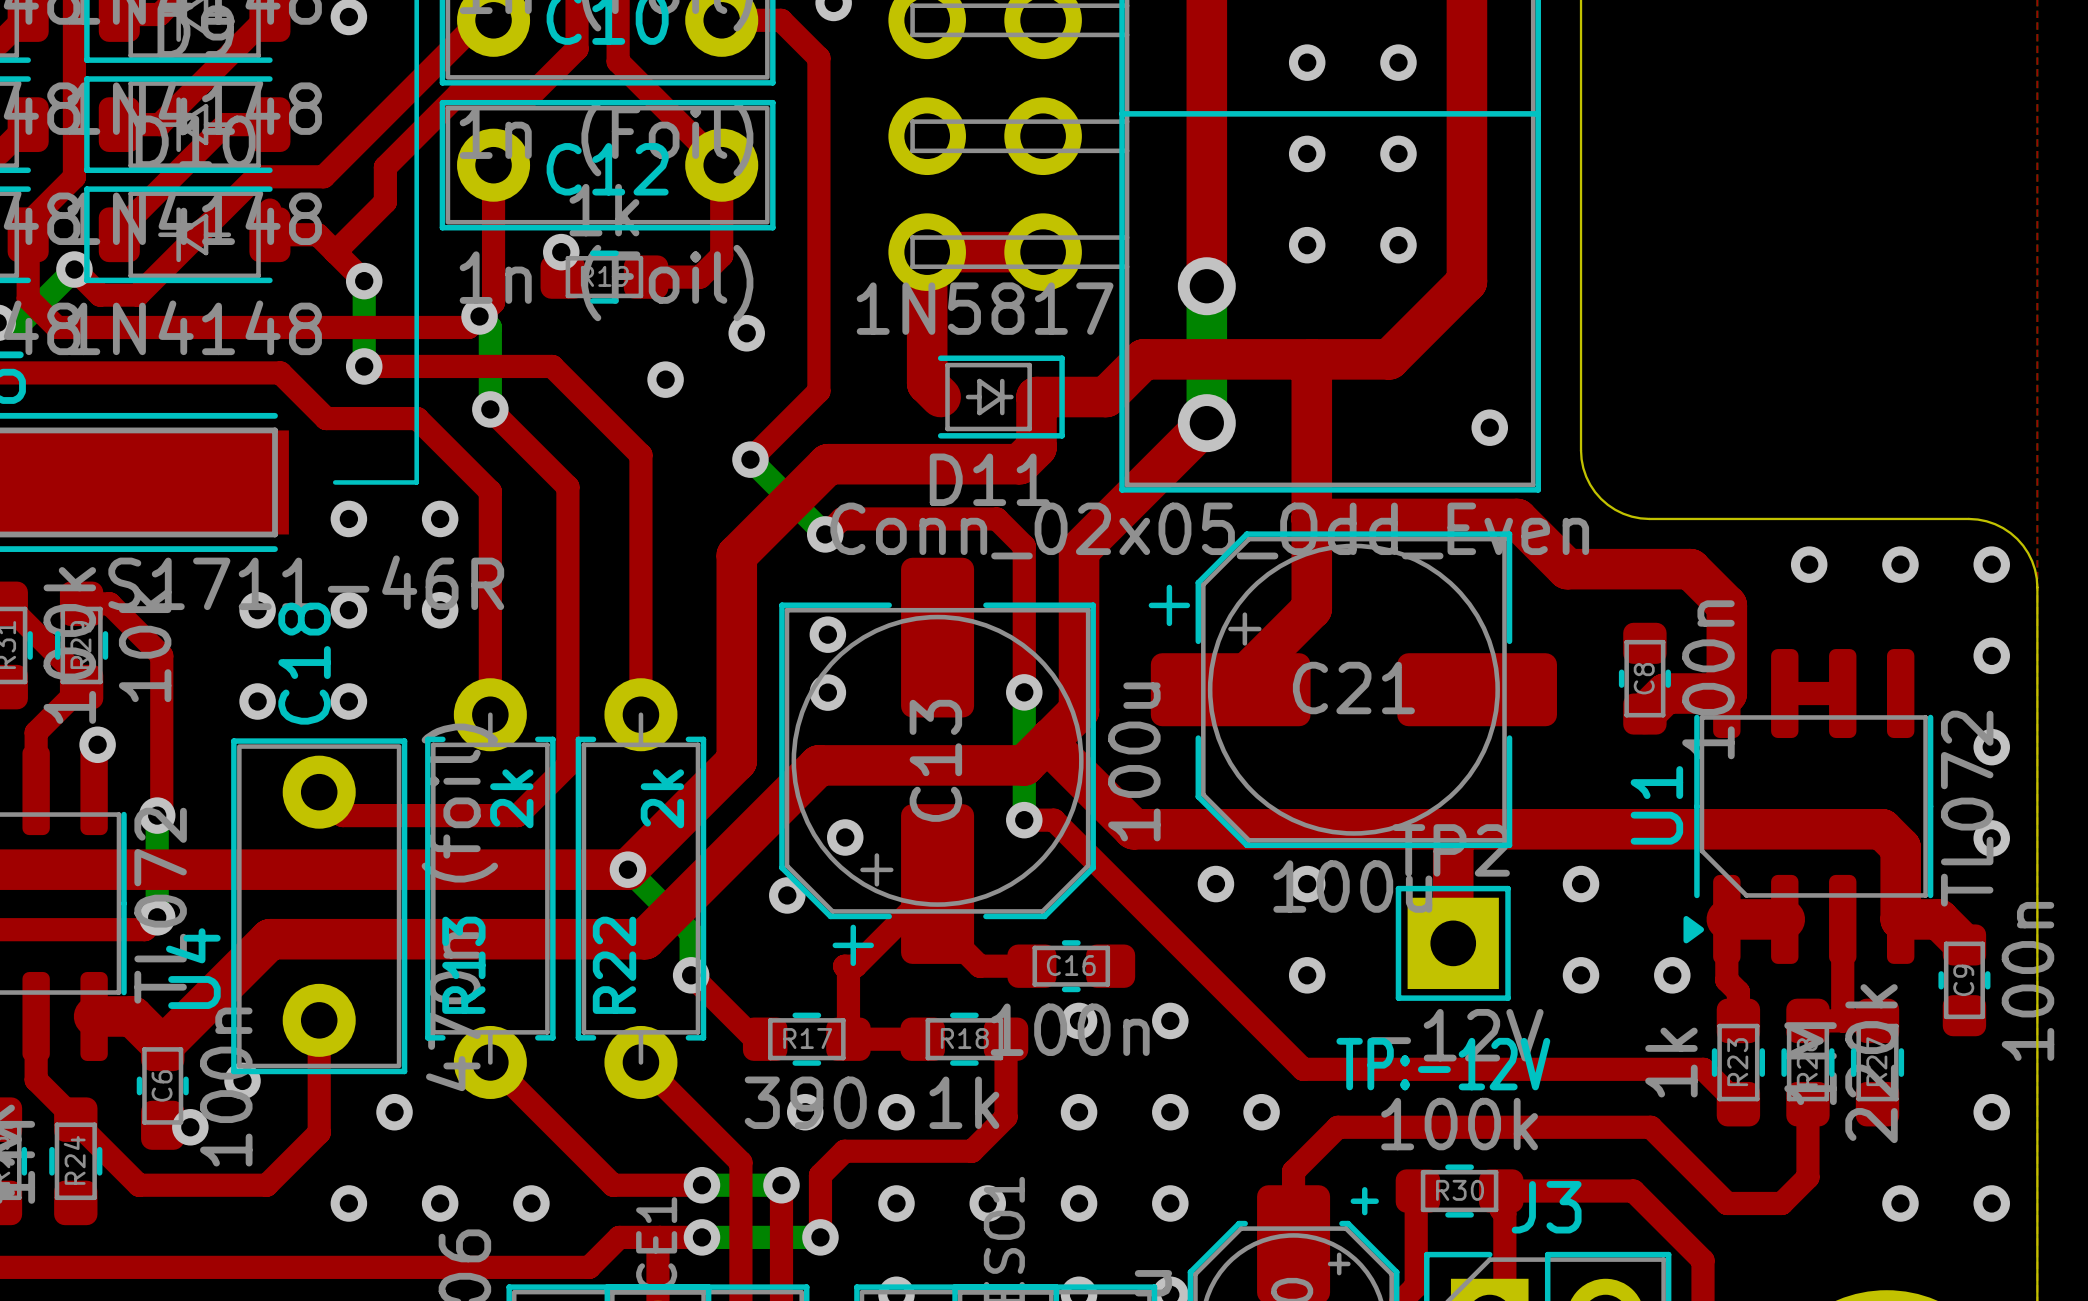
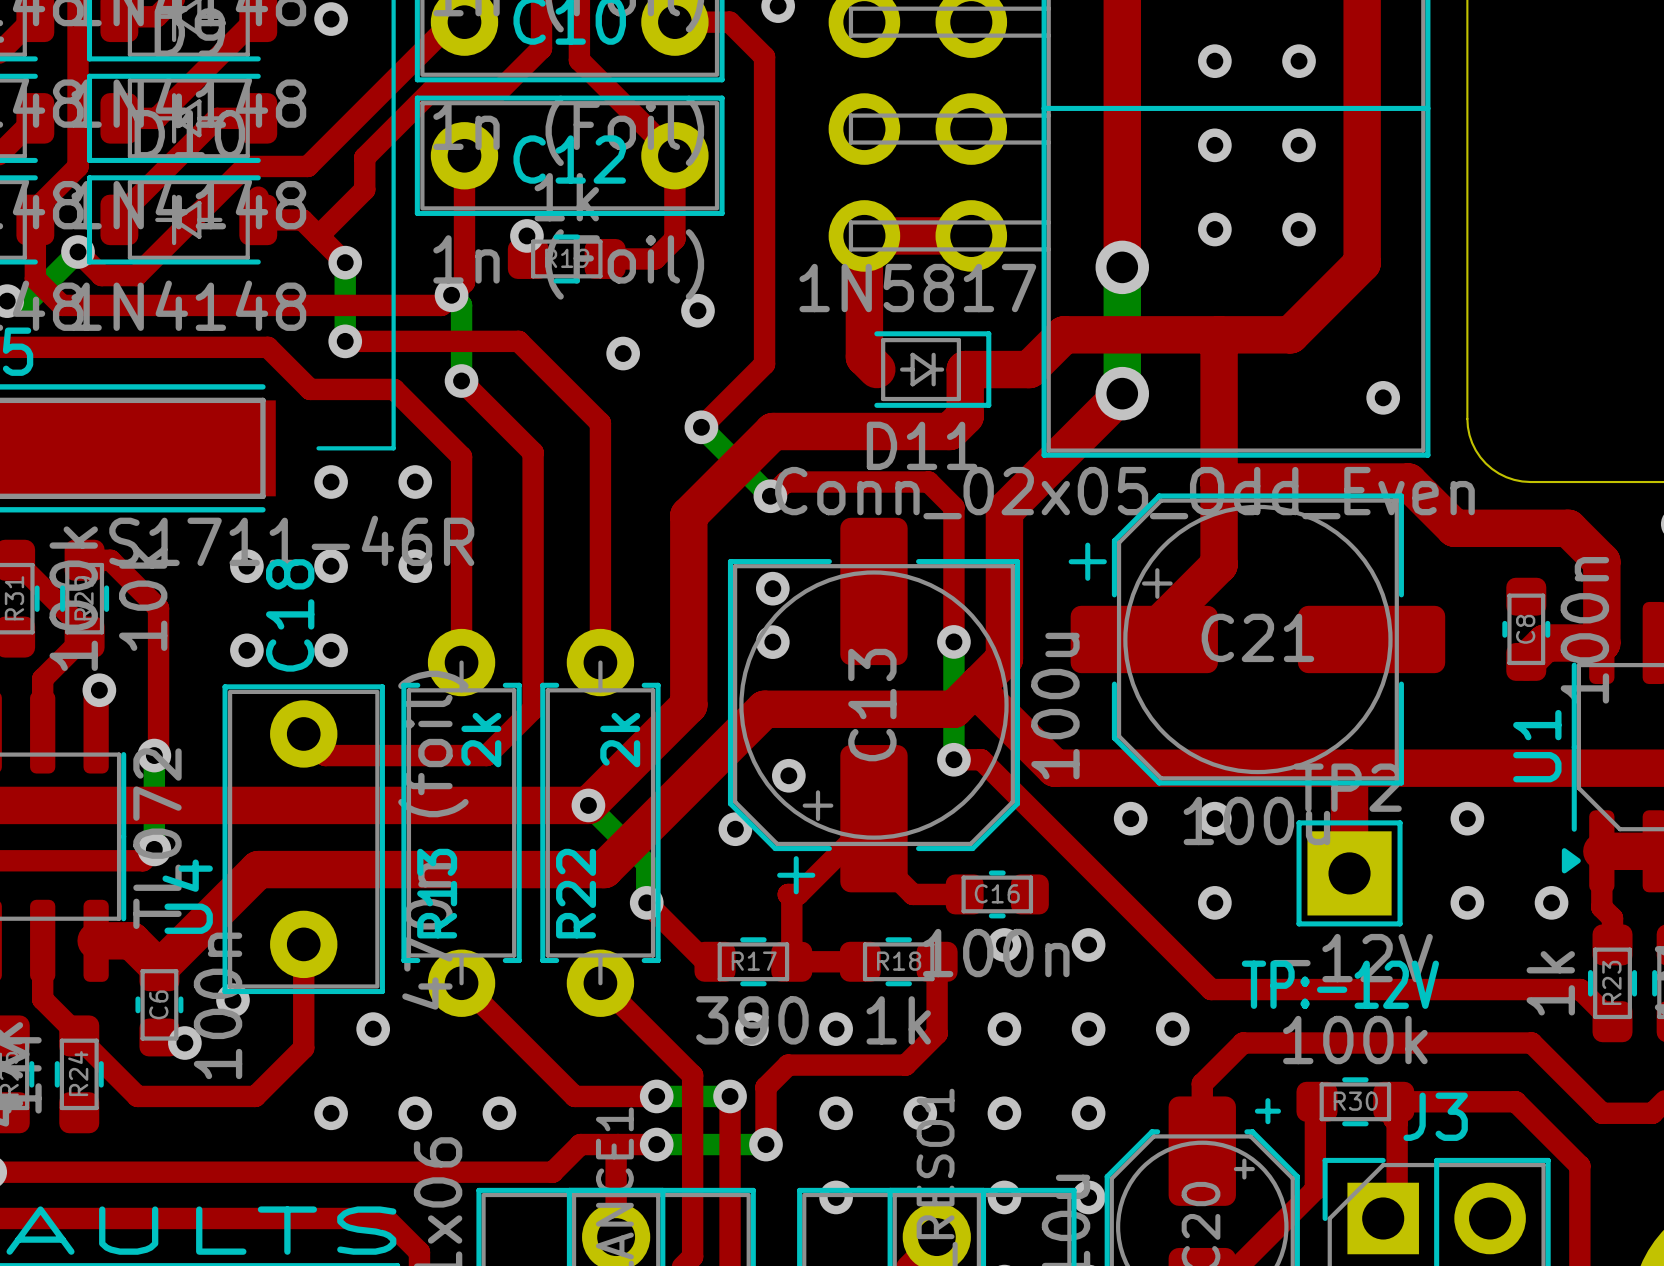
C16 footprint: [1007, 940, 1136, 993] -> [945, 870, 1049, 919]
C6 footprint: [136, 1022, 189, 1150] -> [135, 953, 184, 1057]

